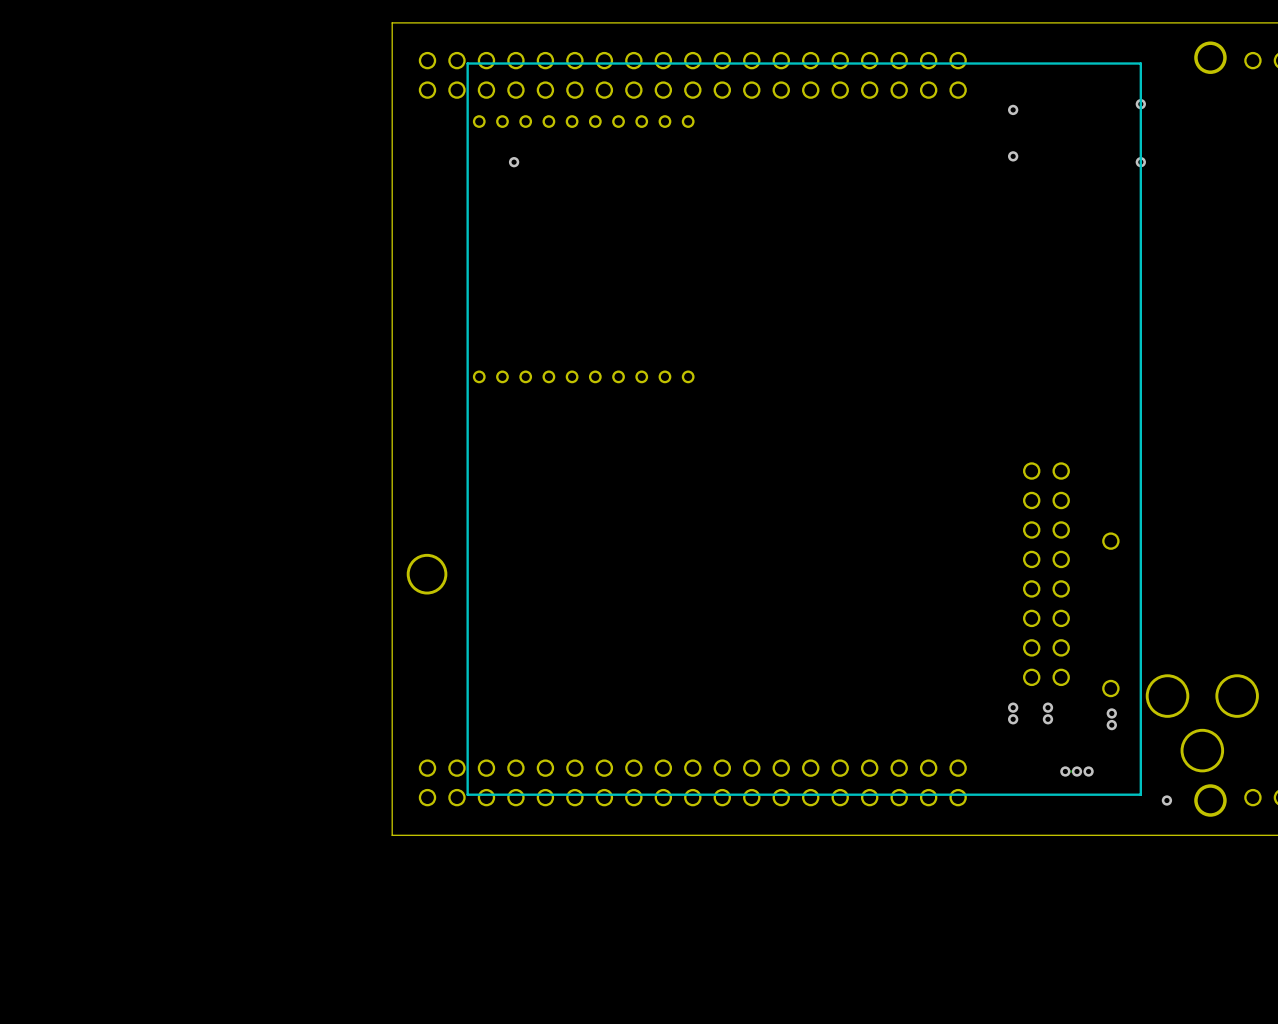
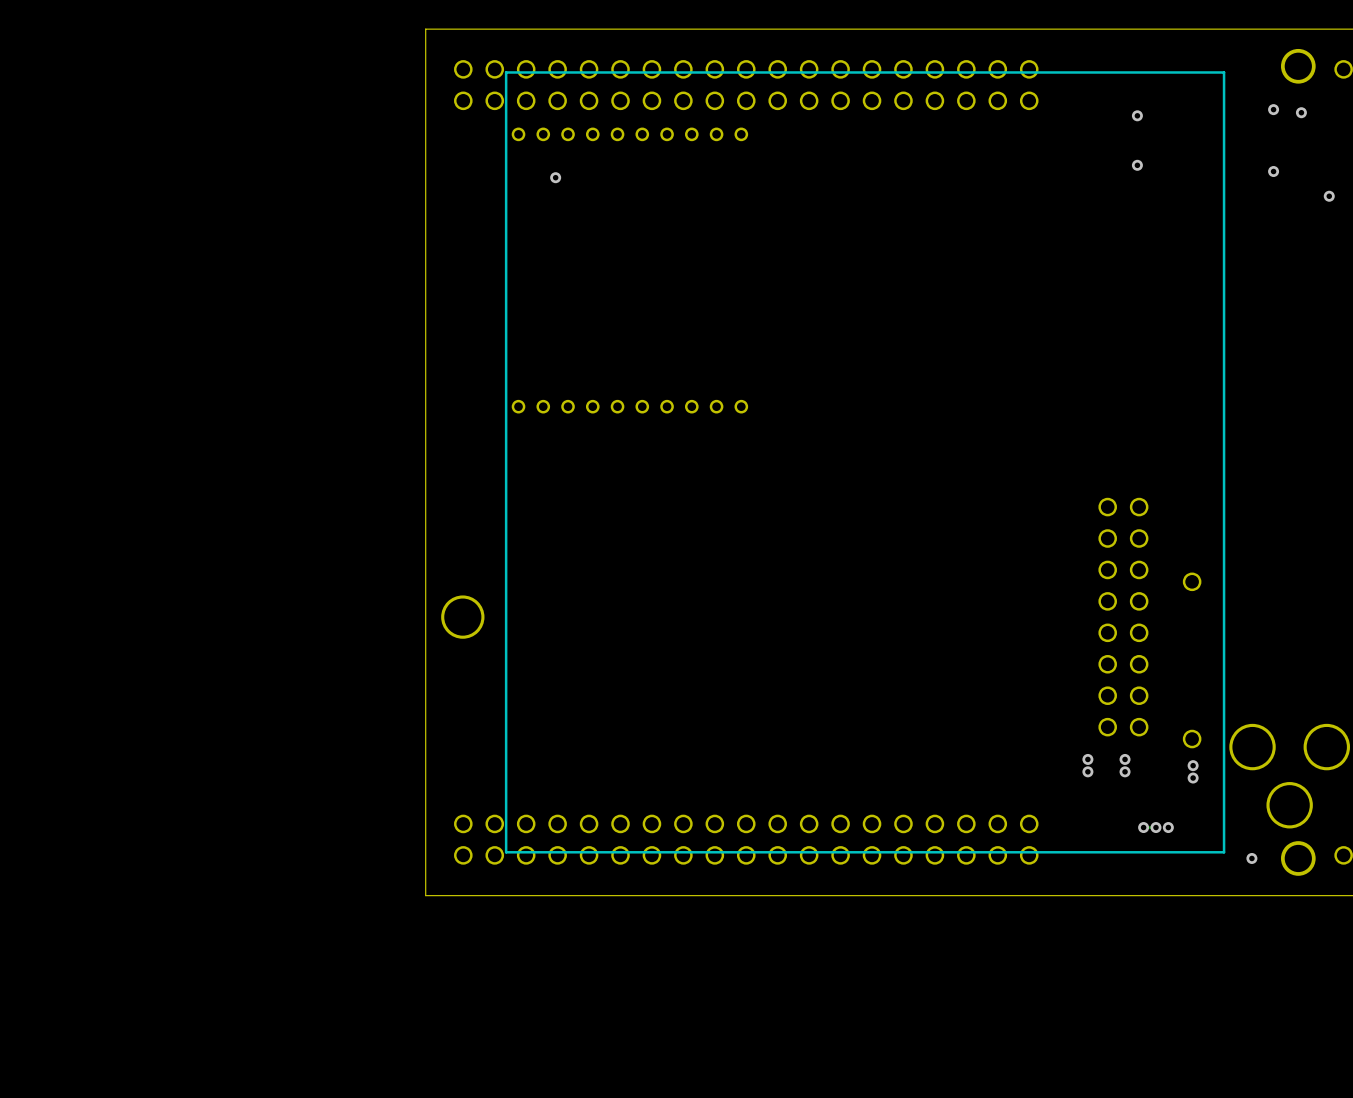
via: none -> (1273, 109)
via: none -> (1301, 112)
via: none -> (1137, 115)
via: (1140, 104) -> none
via: (1013, 109) -> none
via: none -> (1137, 165)
via: (1013, 156) -> none
via: none -> (1273, 171)
via: (1140, 162) -> none
via: none -> (1329, 196)

